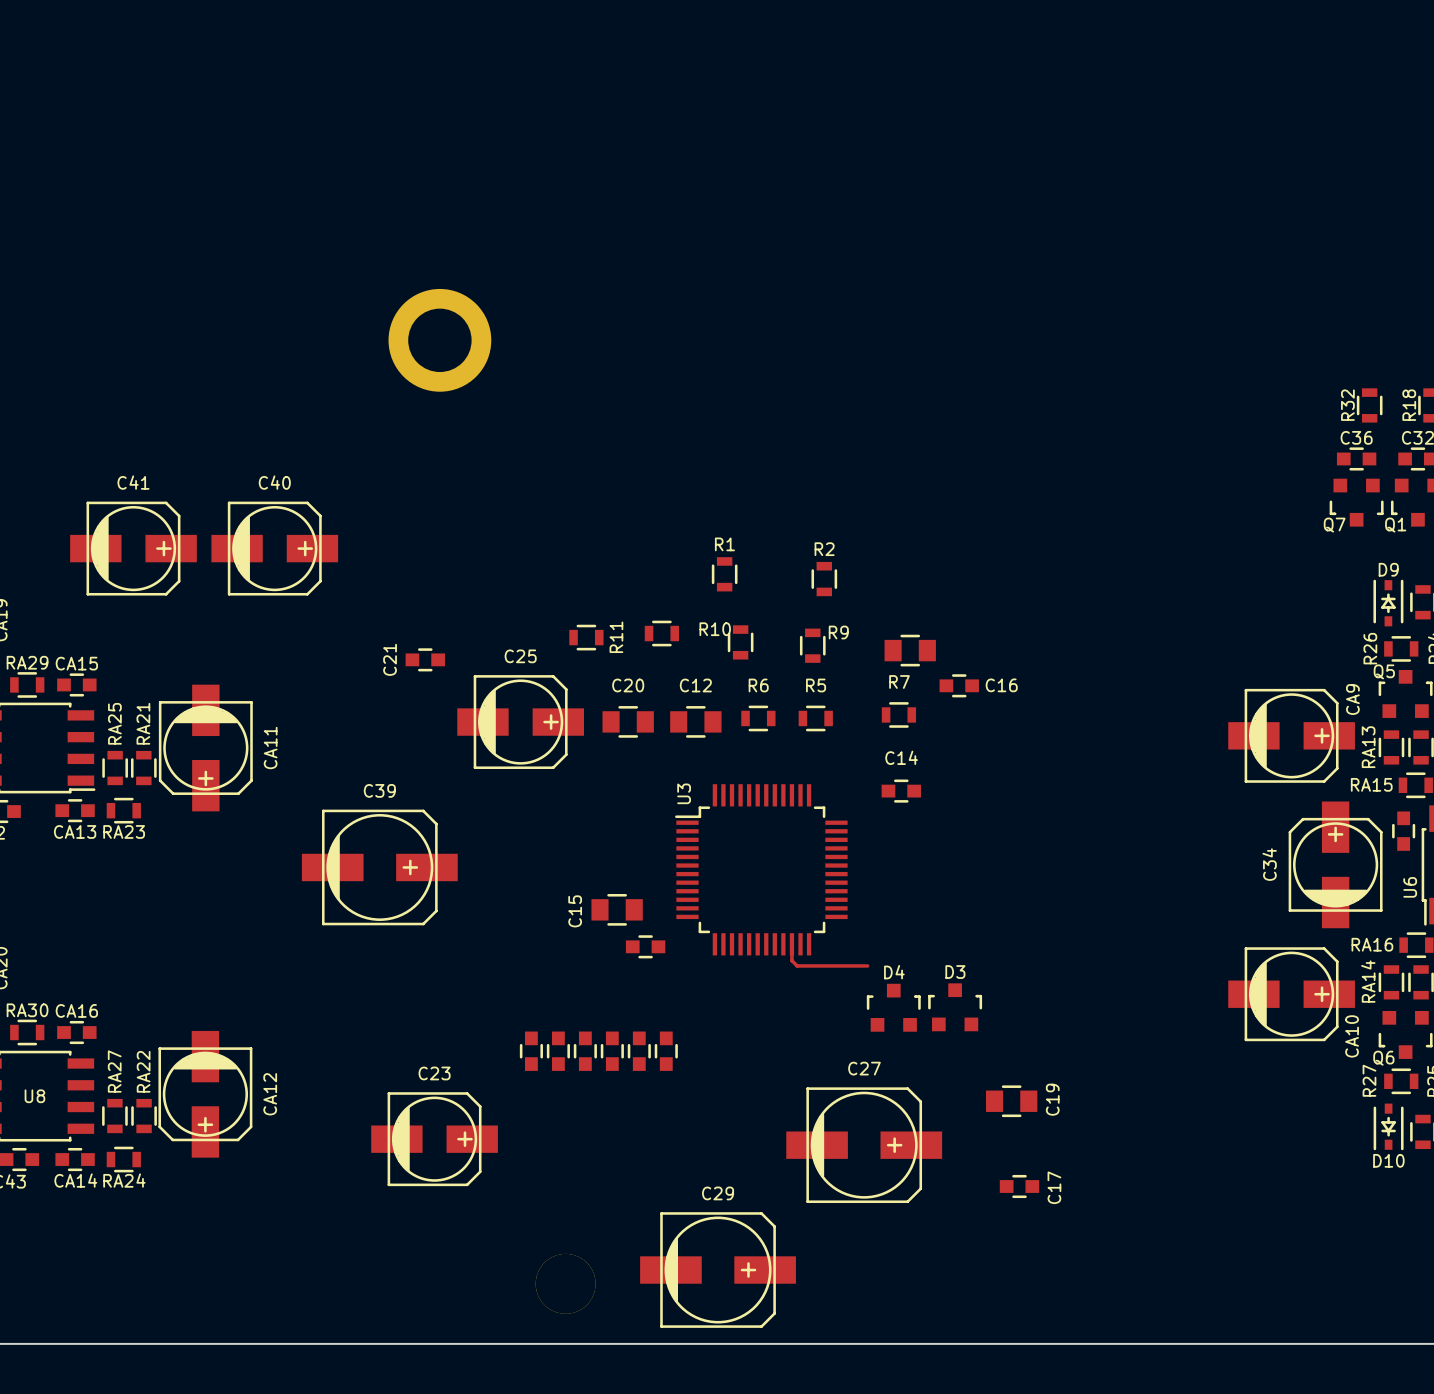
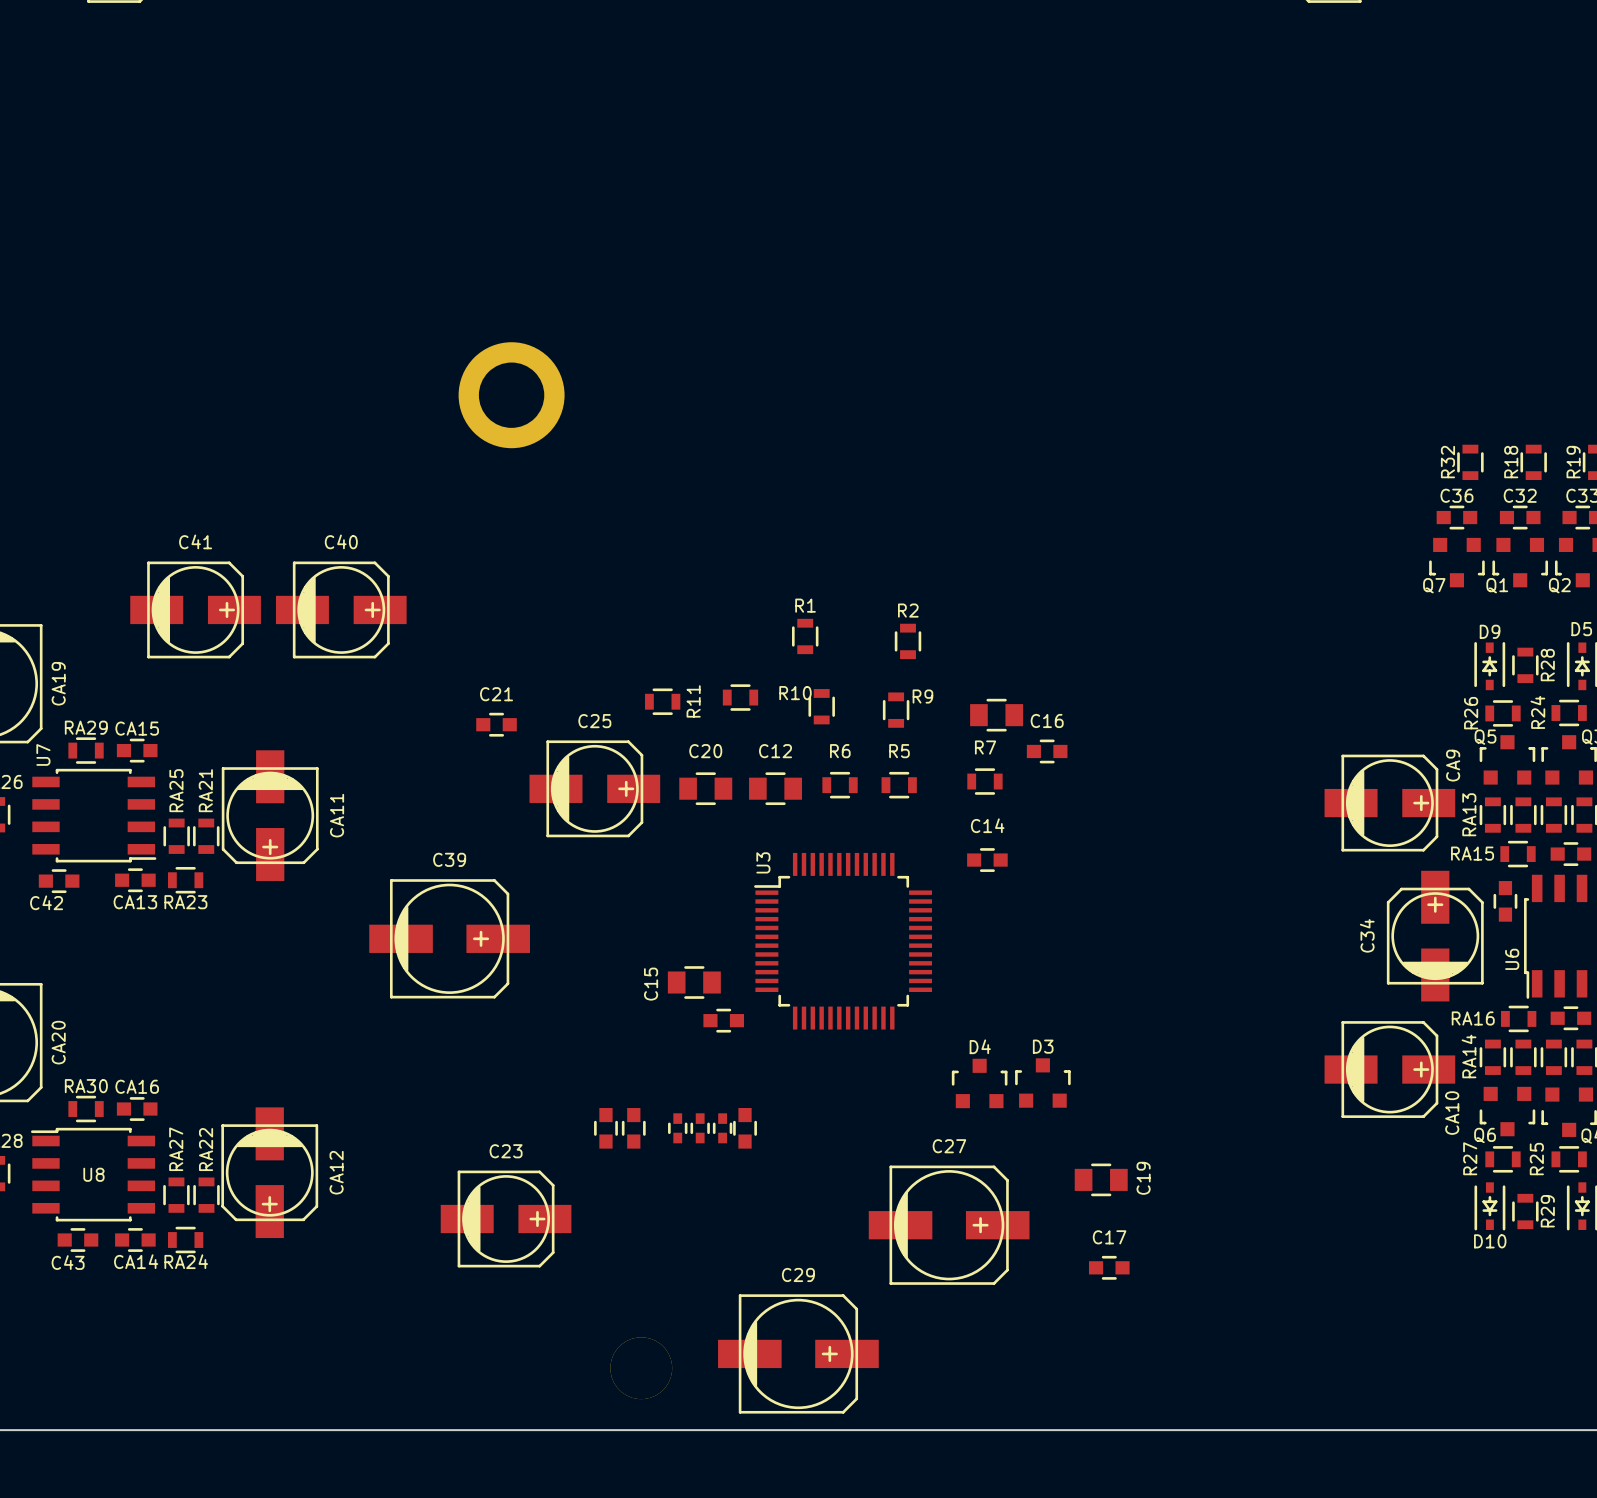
C21 name rotation: 0° (390, 659) -> 90° clockwise (496, 694)
C21 name position: C21 (390, 659) -> C21 (496, 694)
C16 name position: C16 (1001, 685) -> C16 (1047, 720)
top track: (791, 944) (791, 960) (797, 965) (867, 965) -> none
part footprint: [627, 1031, 651, 1071] -> [712, 1113, 733, 1144]
part: (585, 1051) -> none
part: none -> (677, 1128)
part: (612, 1051) -> none
part: none -> (700, 1128)
C17 name rotation: 0° (1054, 1187) -> 90° clockwise (1109, 1237)
C17 name position: C17 (1054, 1187) -> C17 (1109, 1237)

